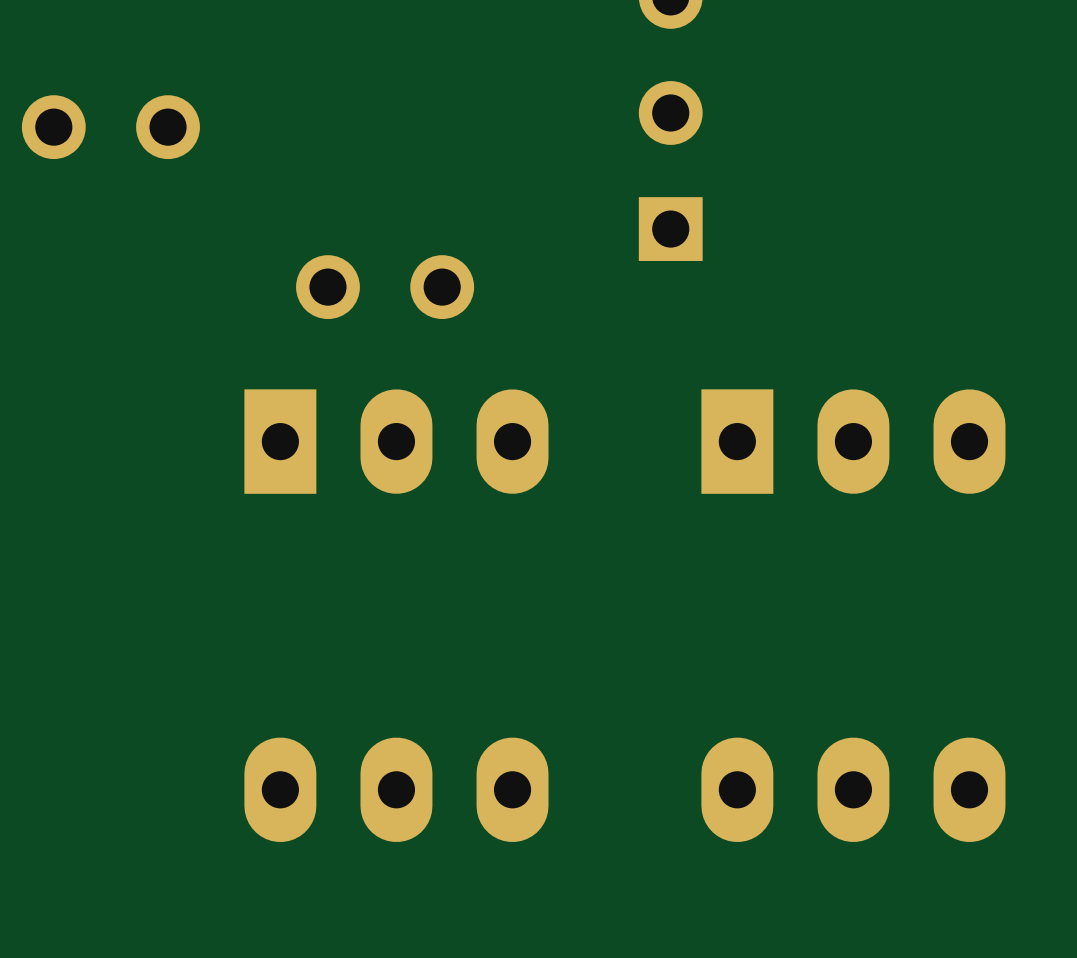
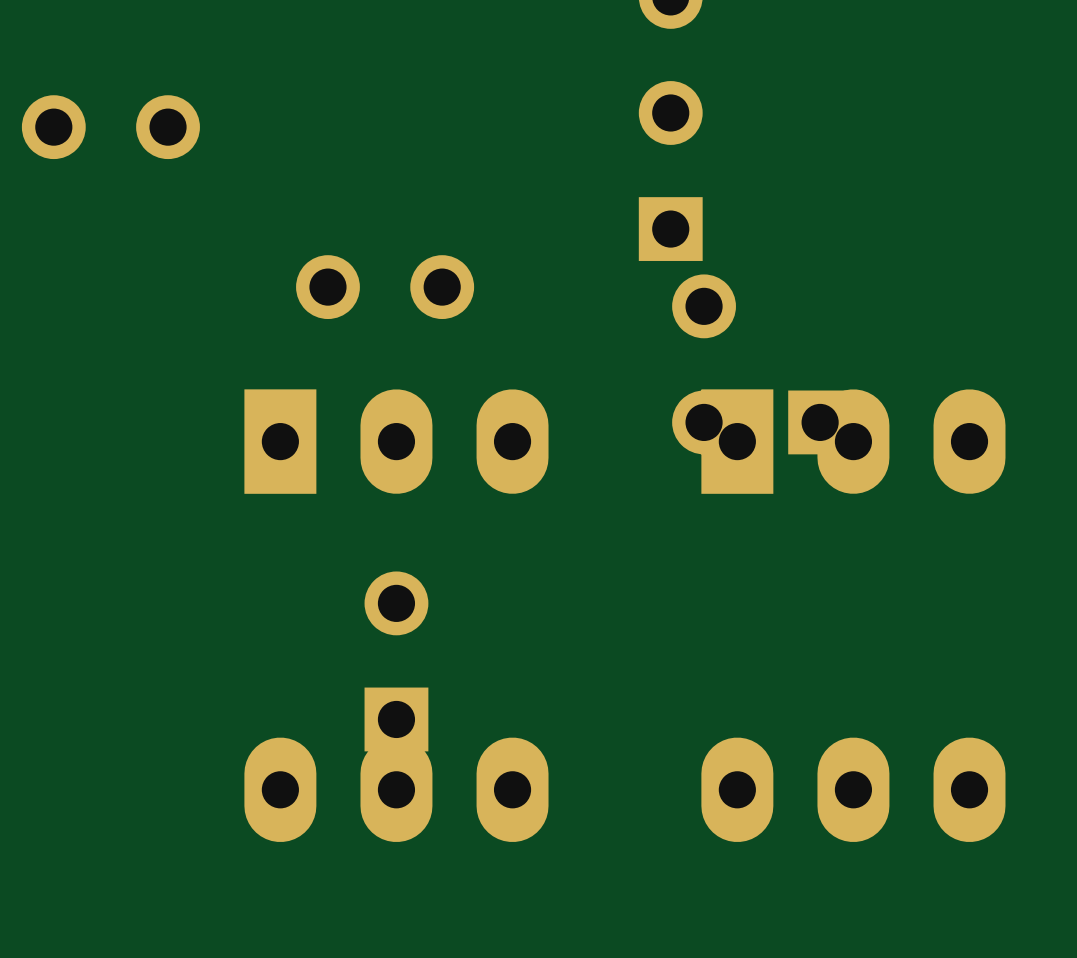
part: none -> (762, 364)
part: none -> (396, 661)

